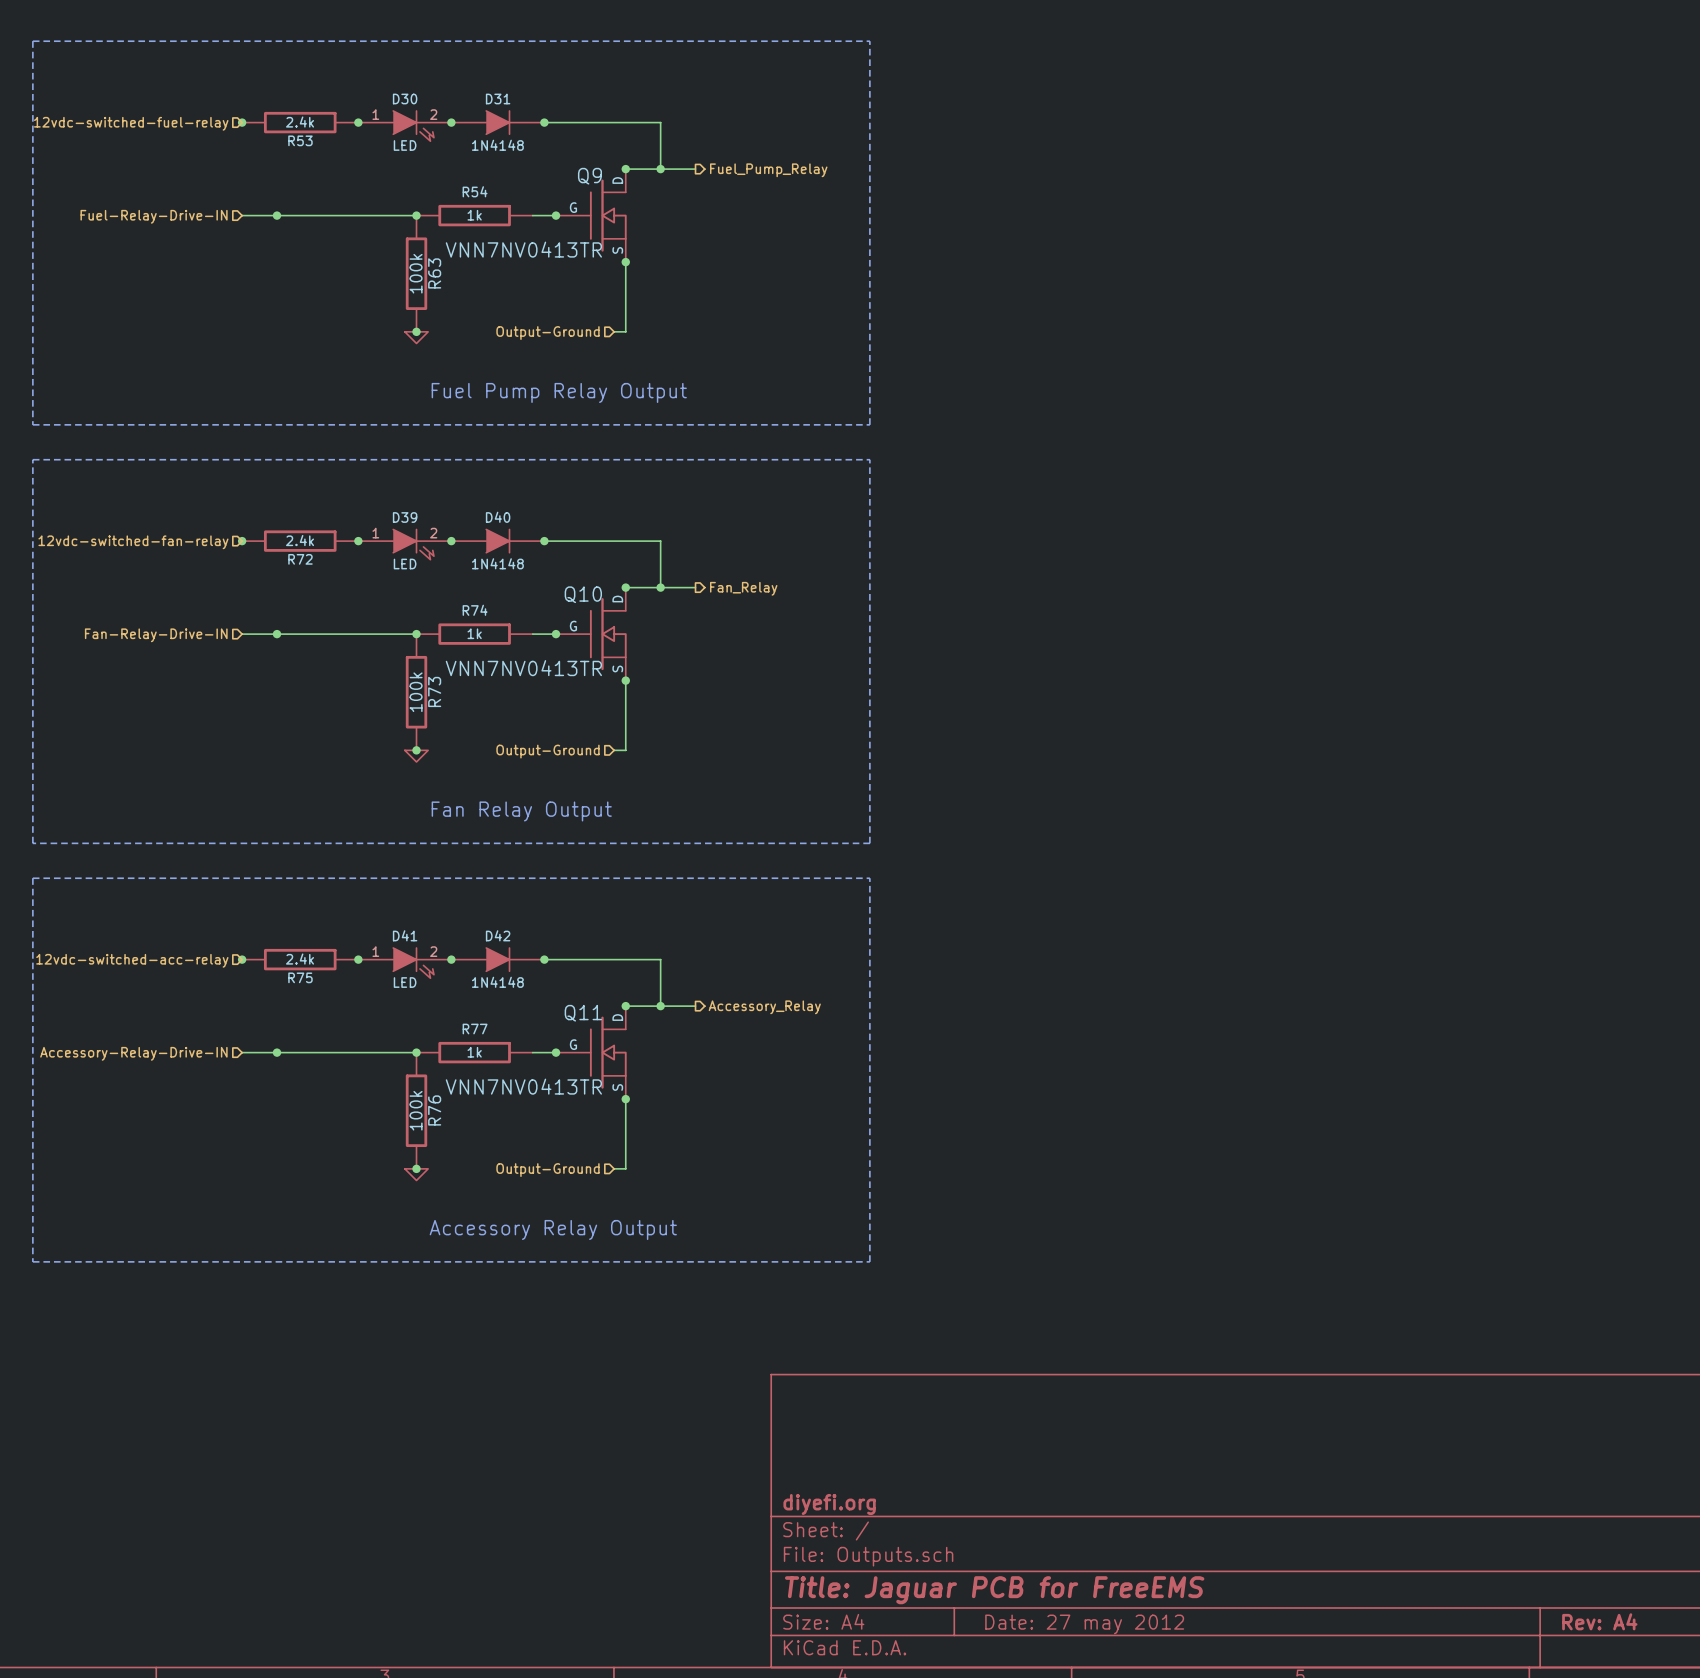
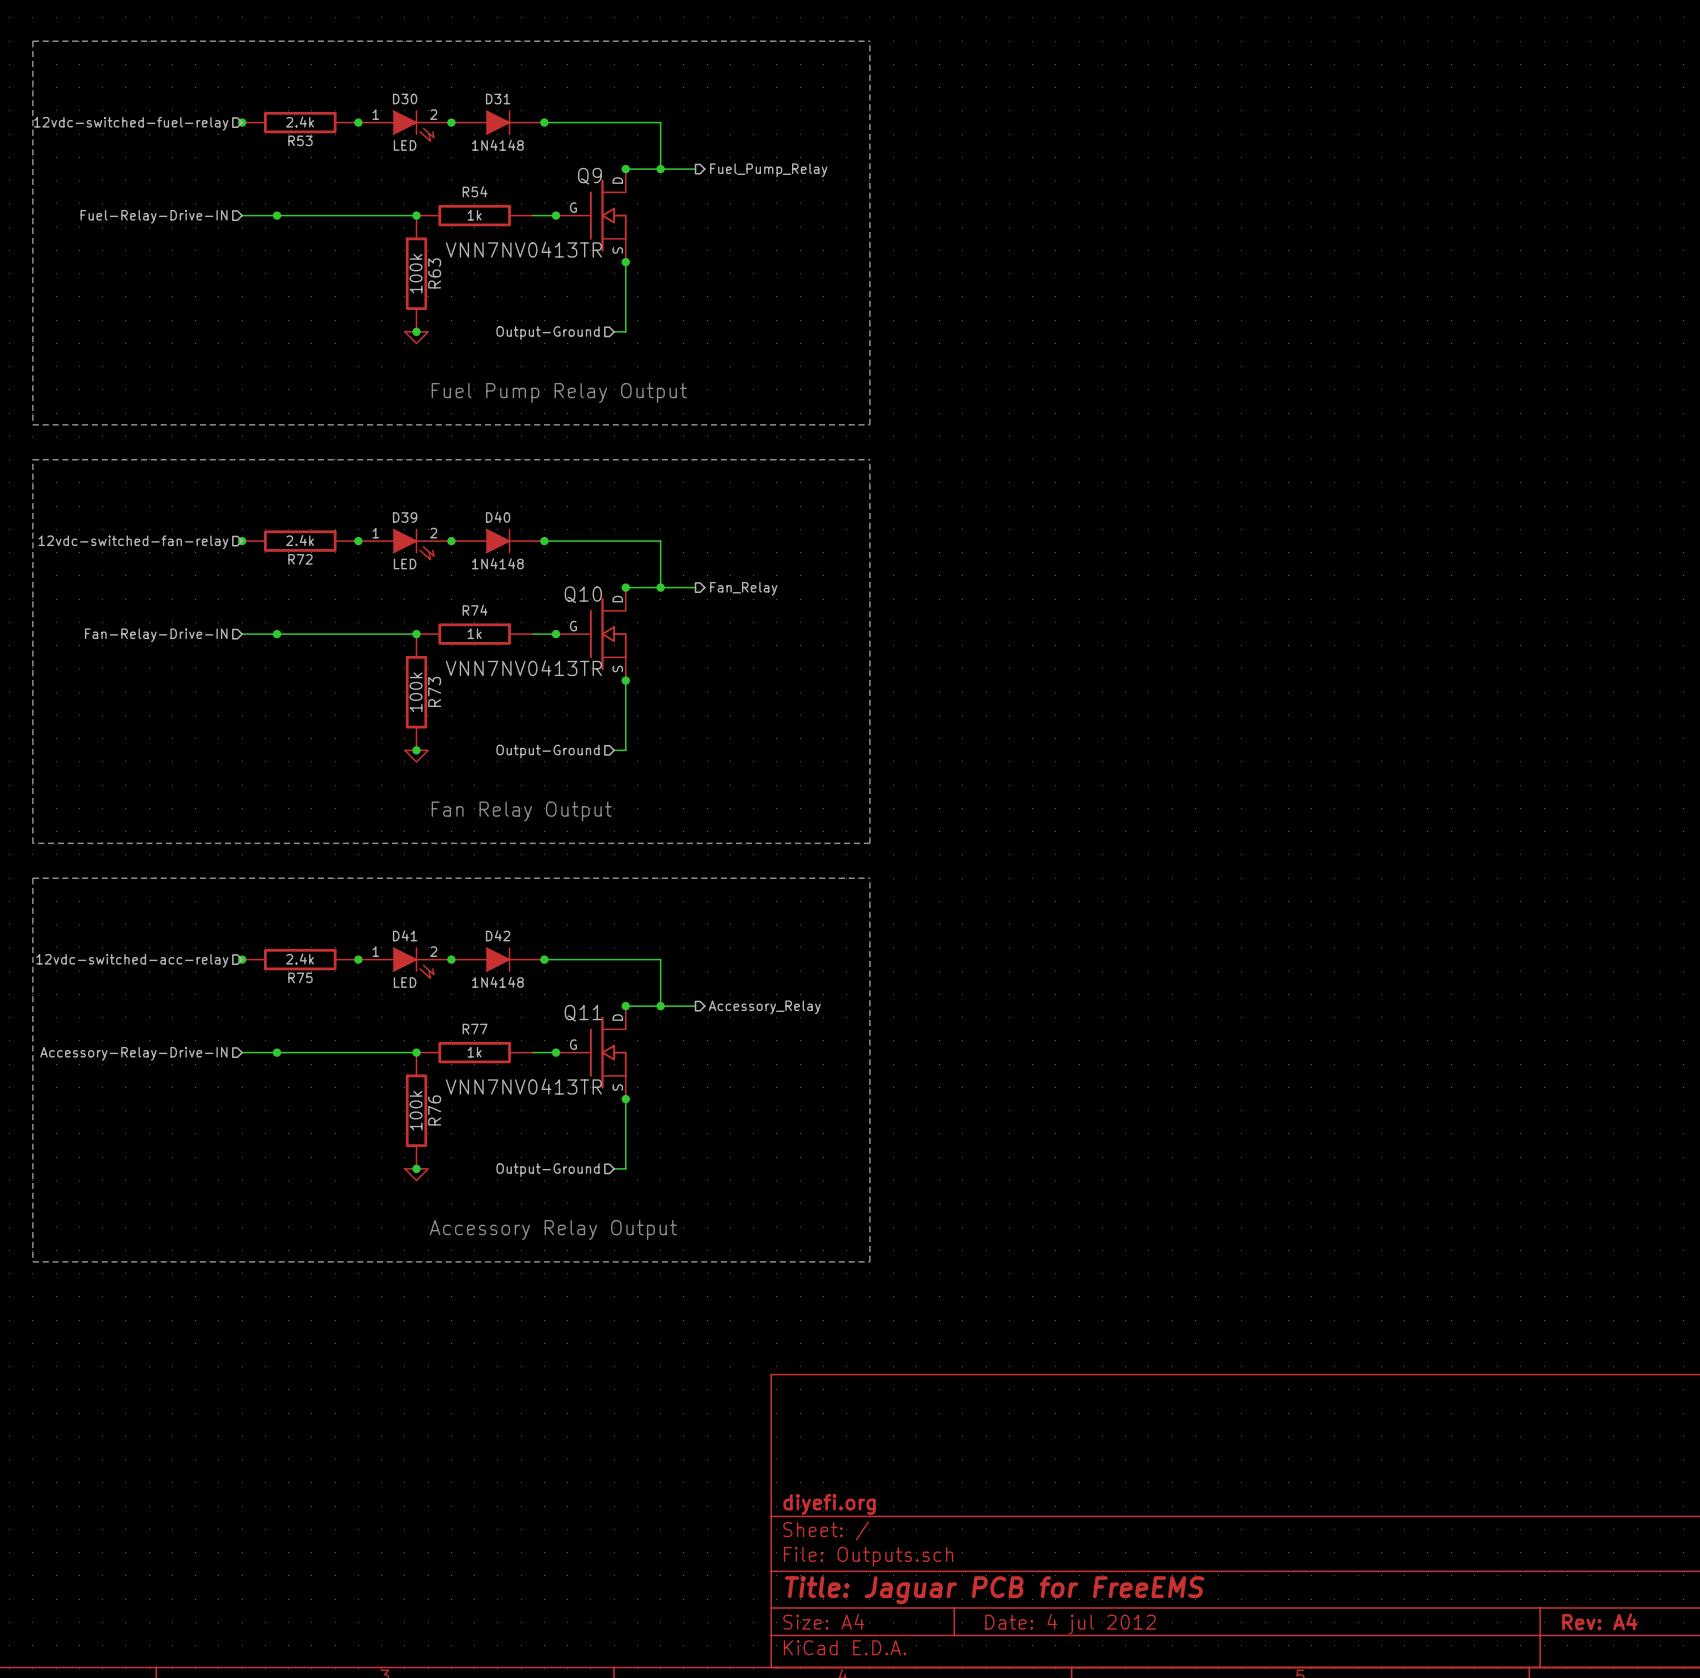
title block: Date: 27 may 2012 (1084, 1624) -> Date: 4 jul 2012 (1070, 1624)

